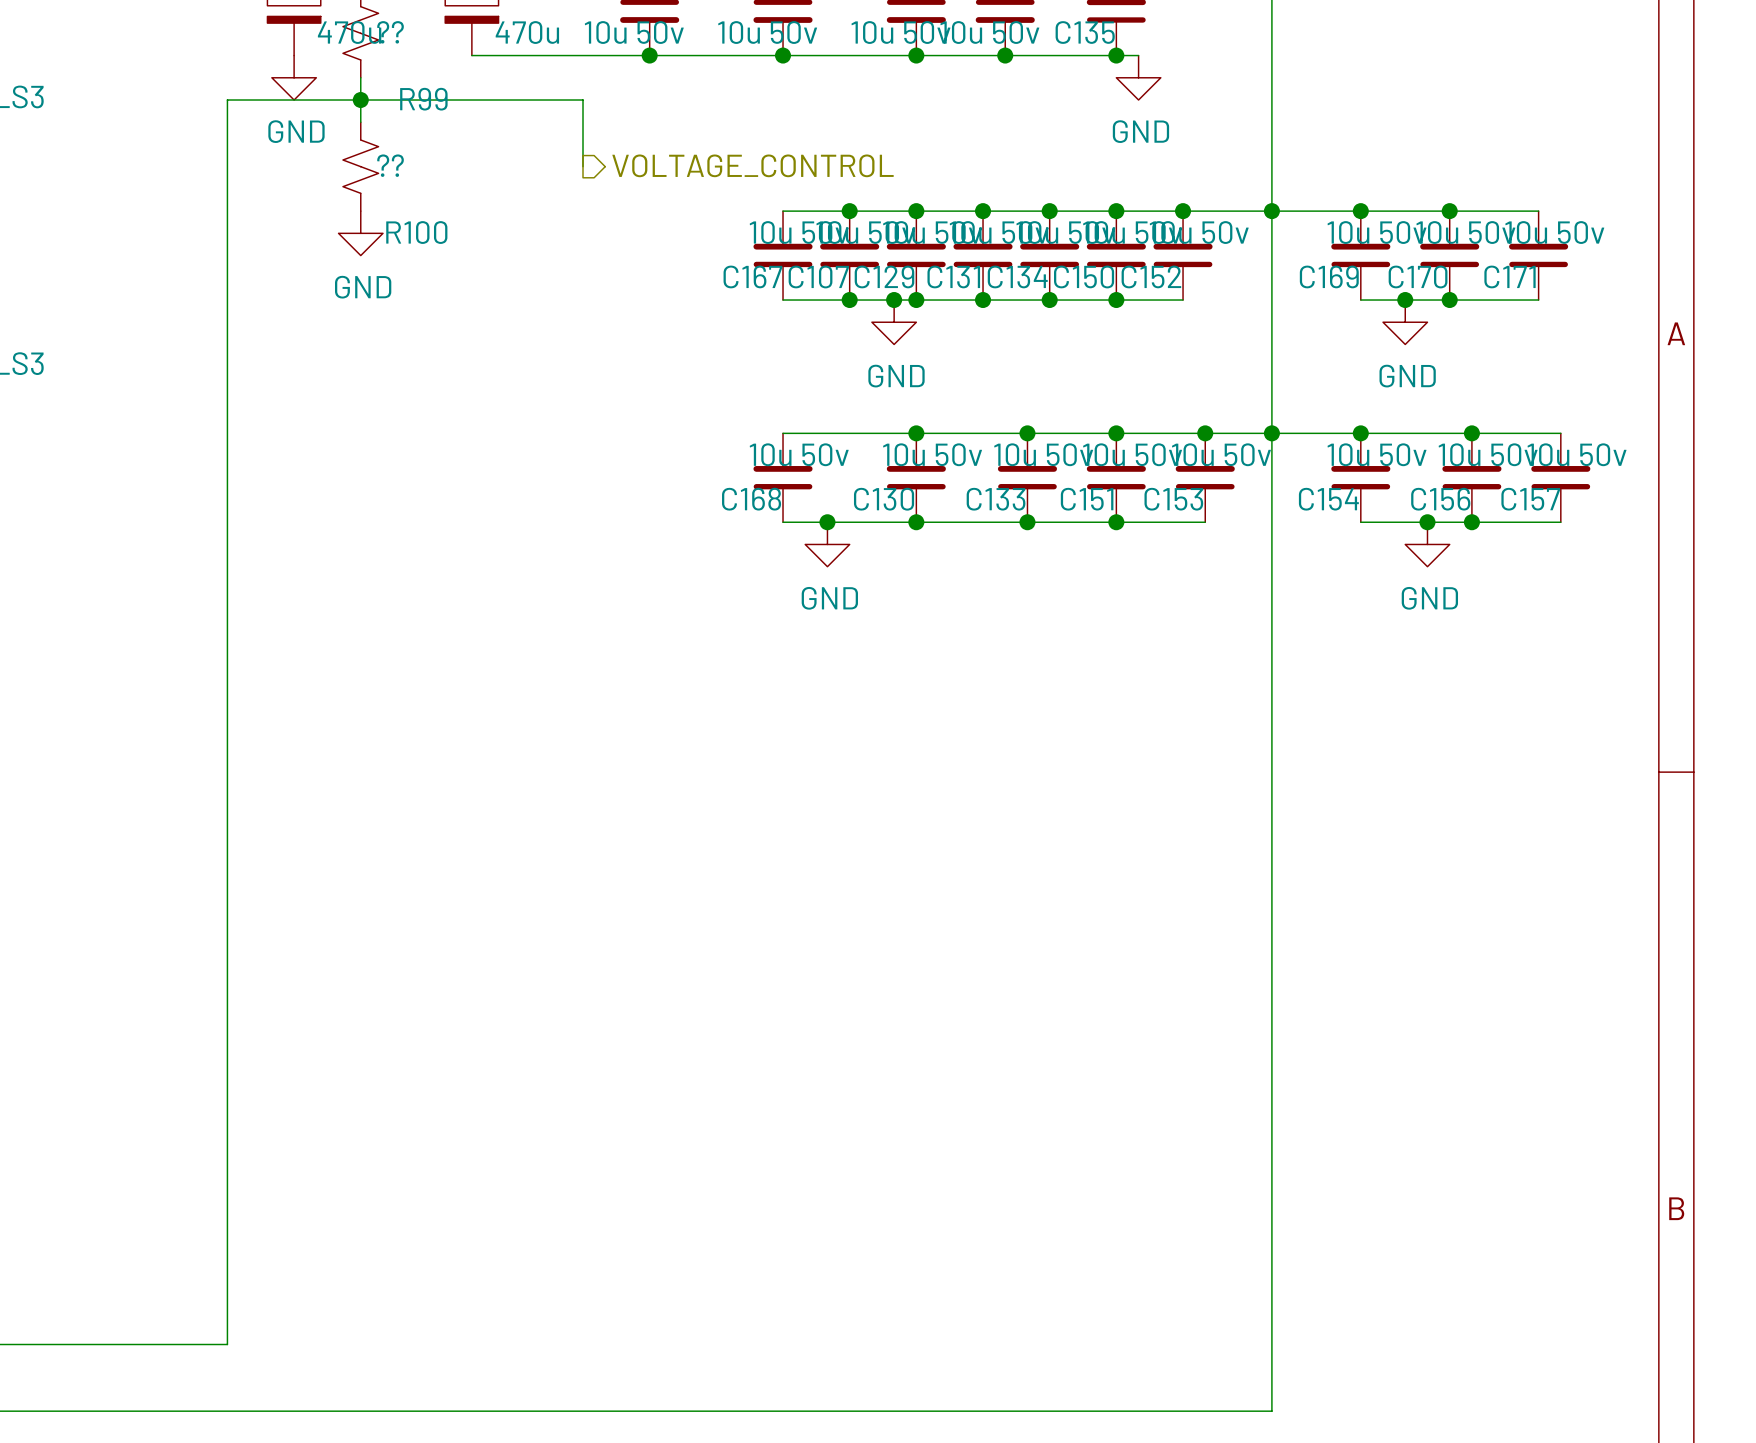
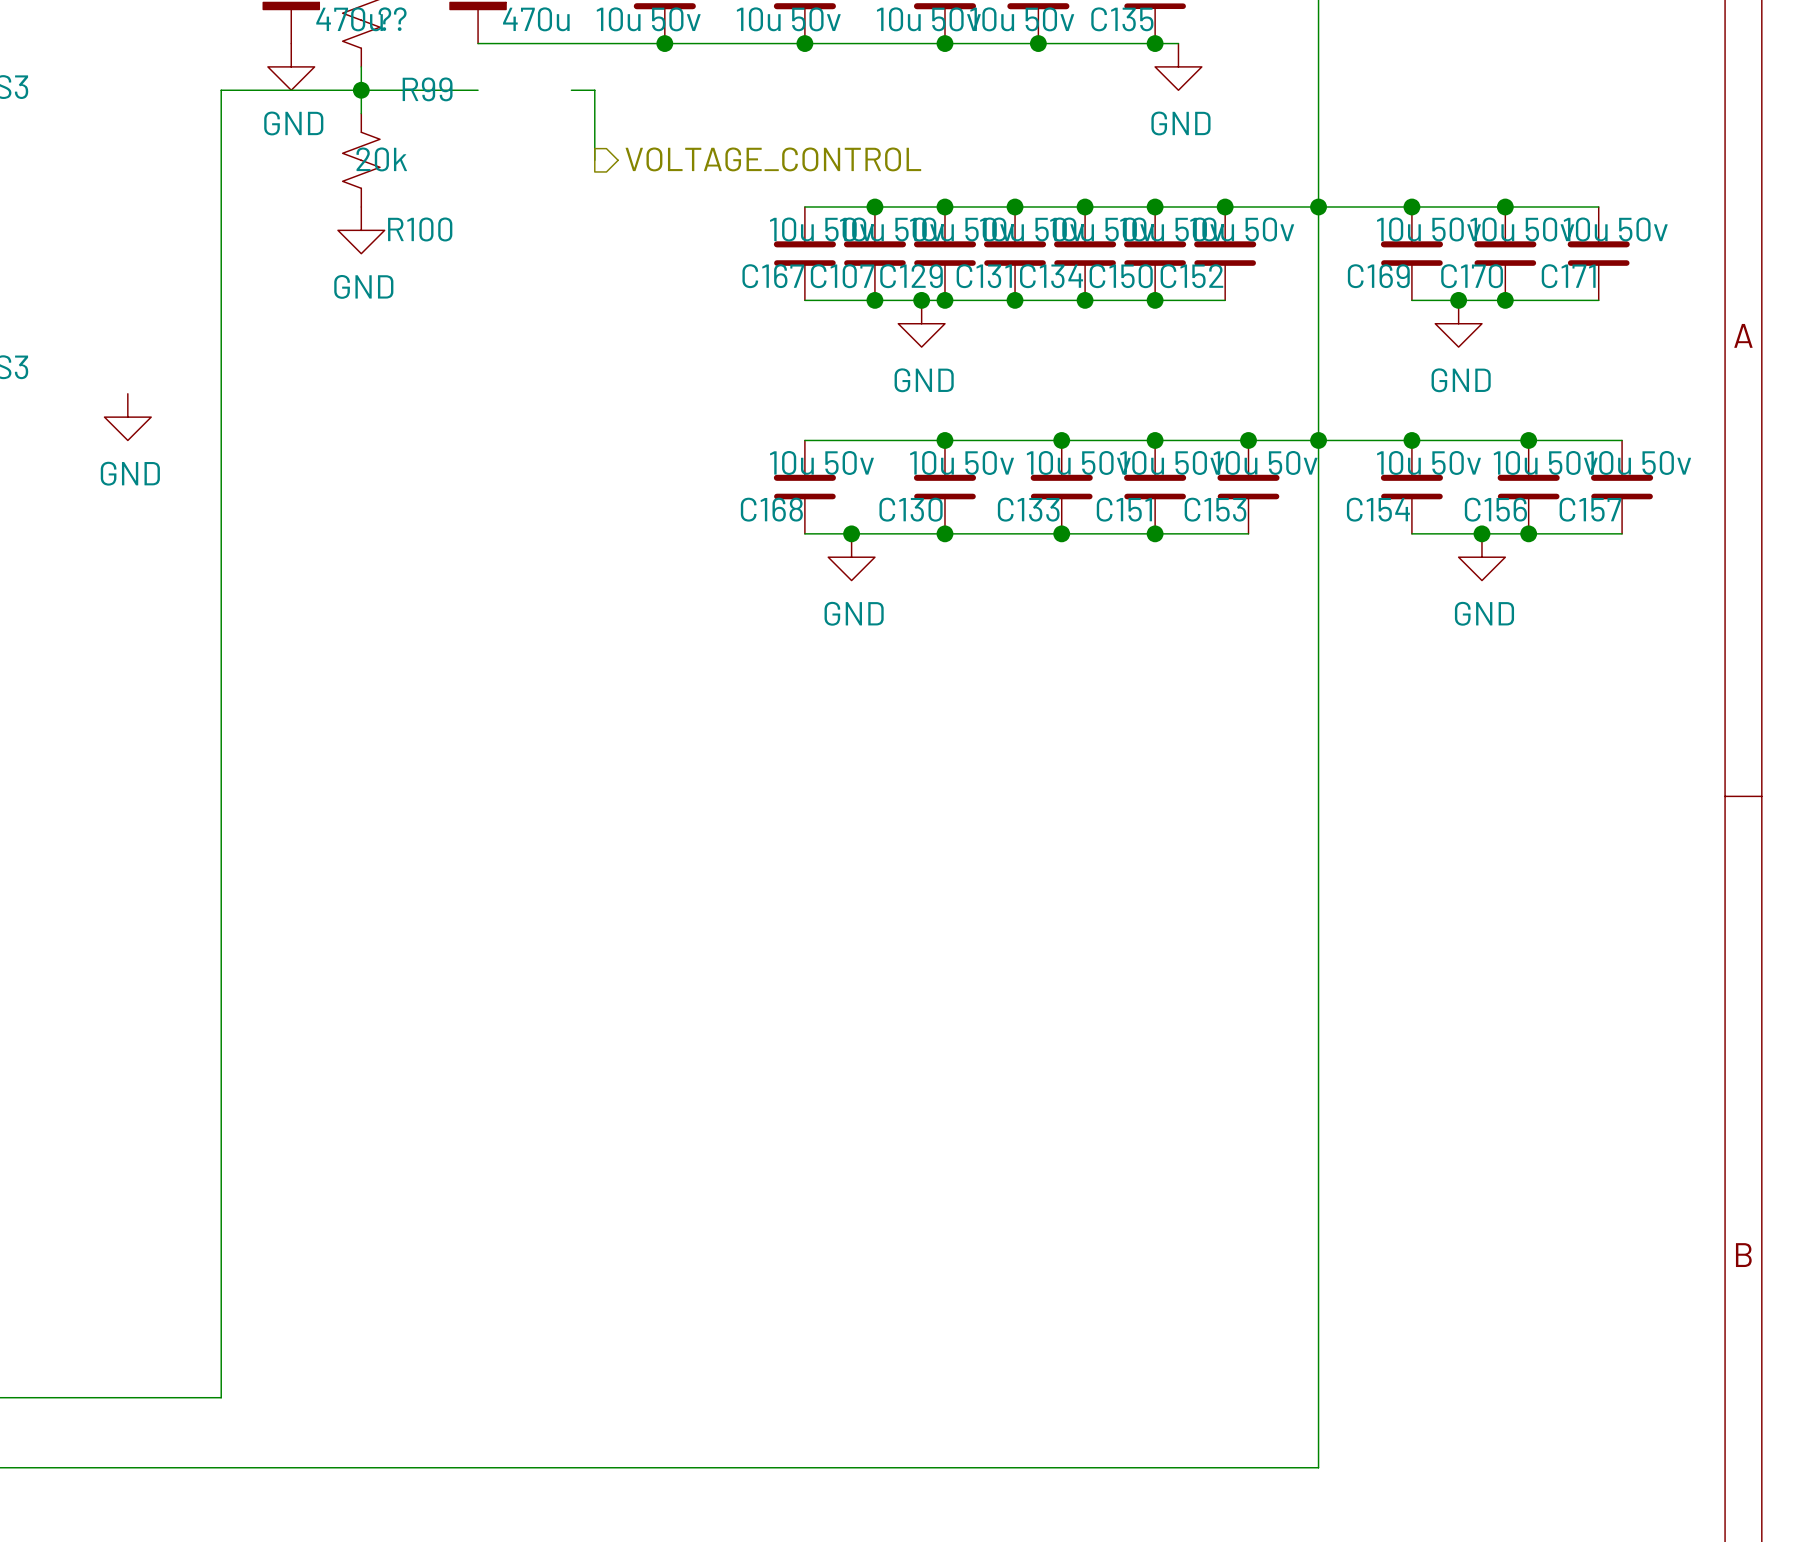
wire: (471, 100) (560, 100) -> none
R100 value: ?? (390, 165) -> 20k (381, 159)
power symbol: none -> GND (127, 417)

